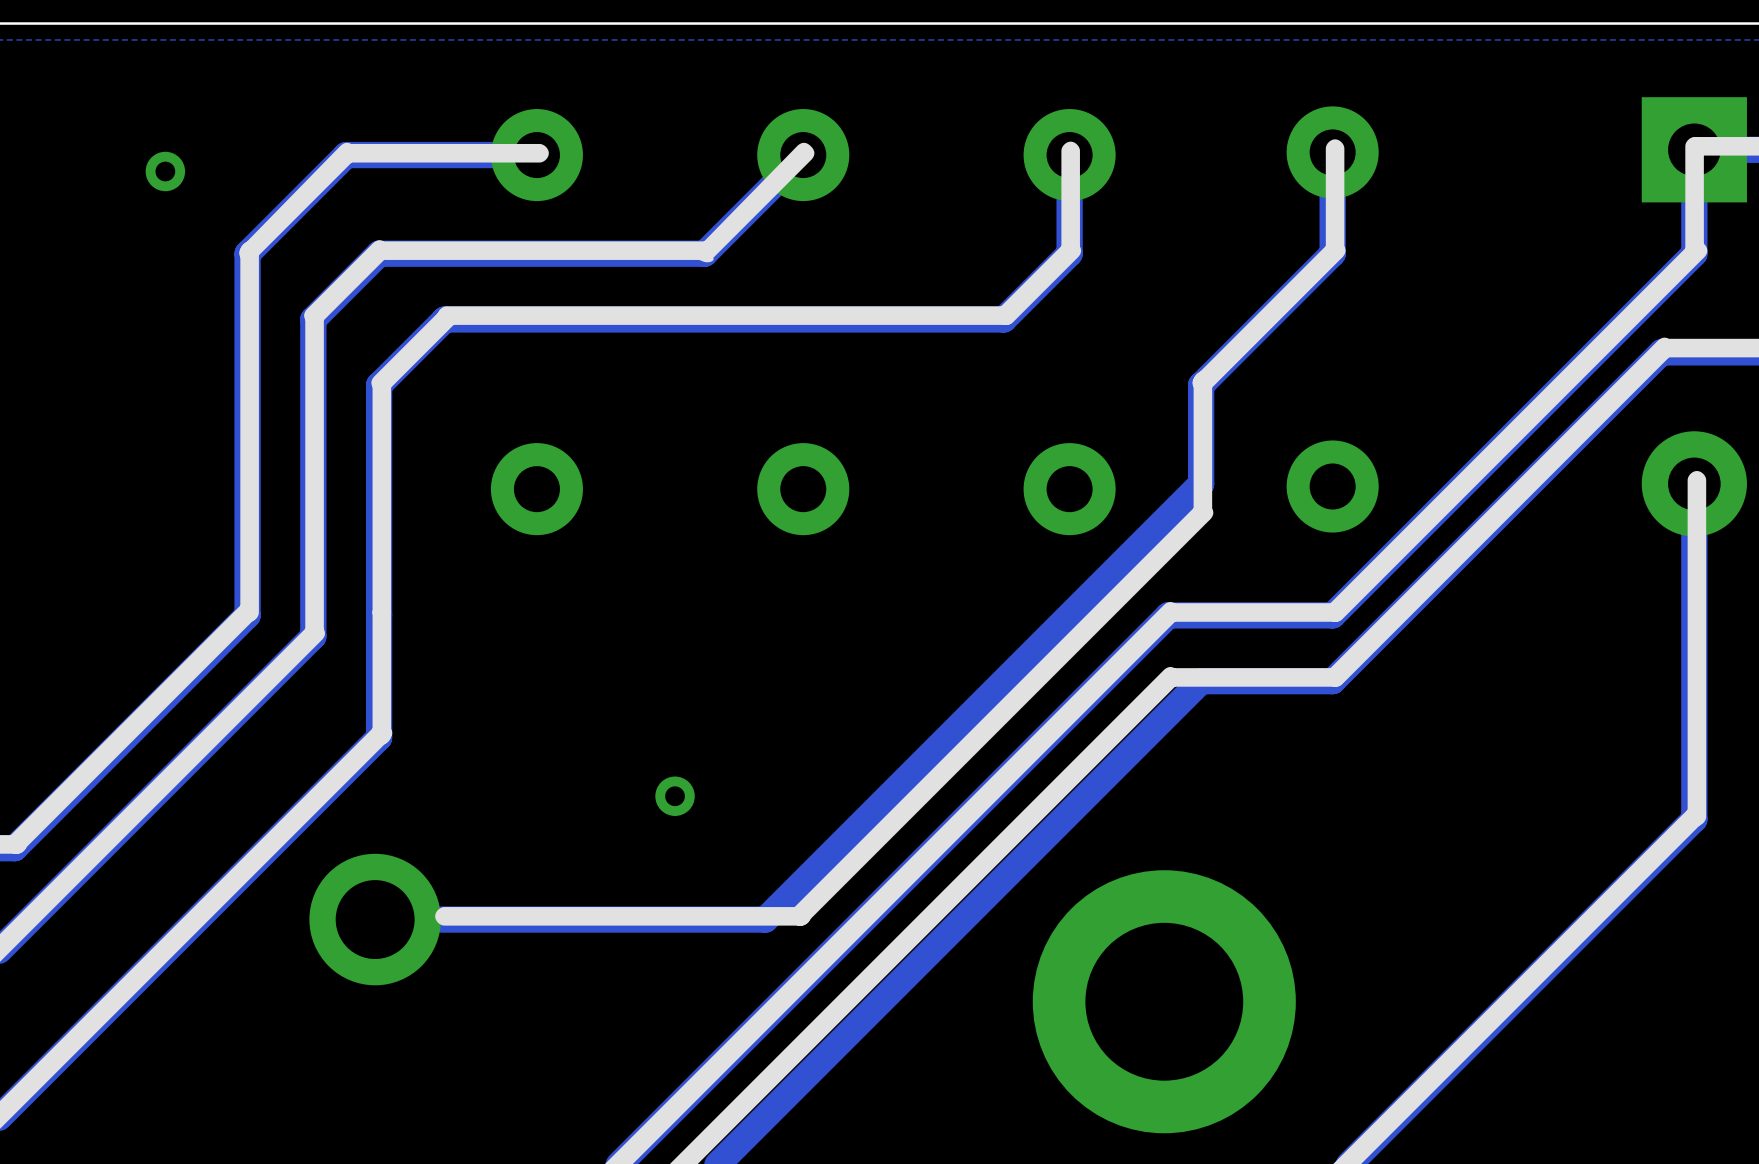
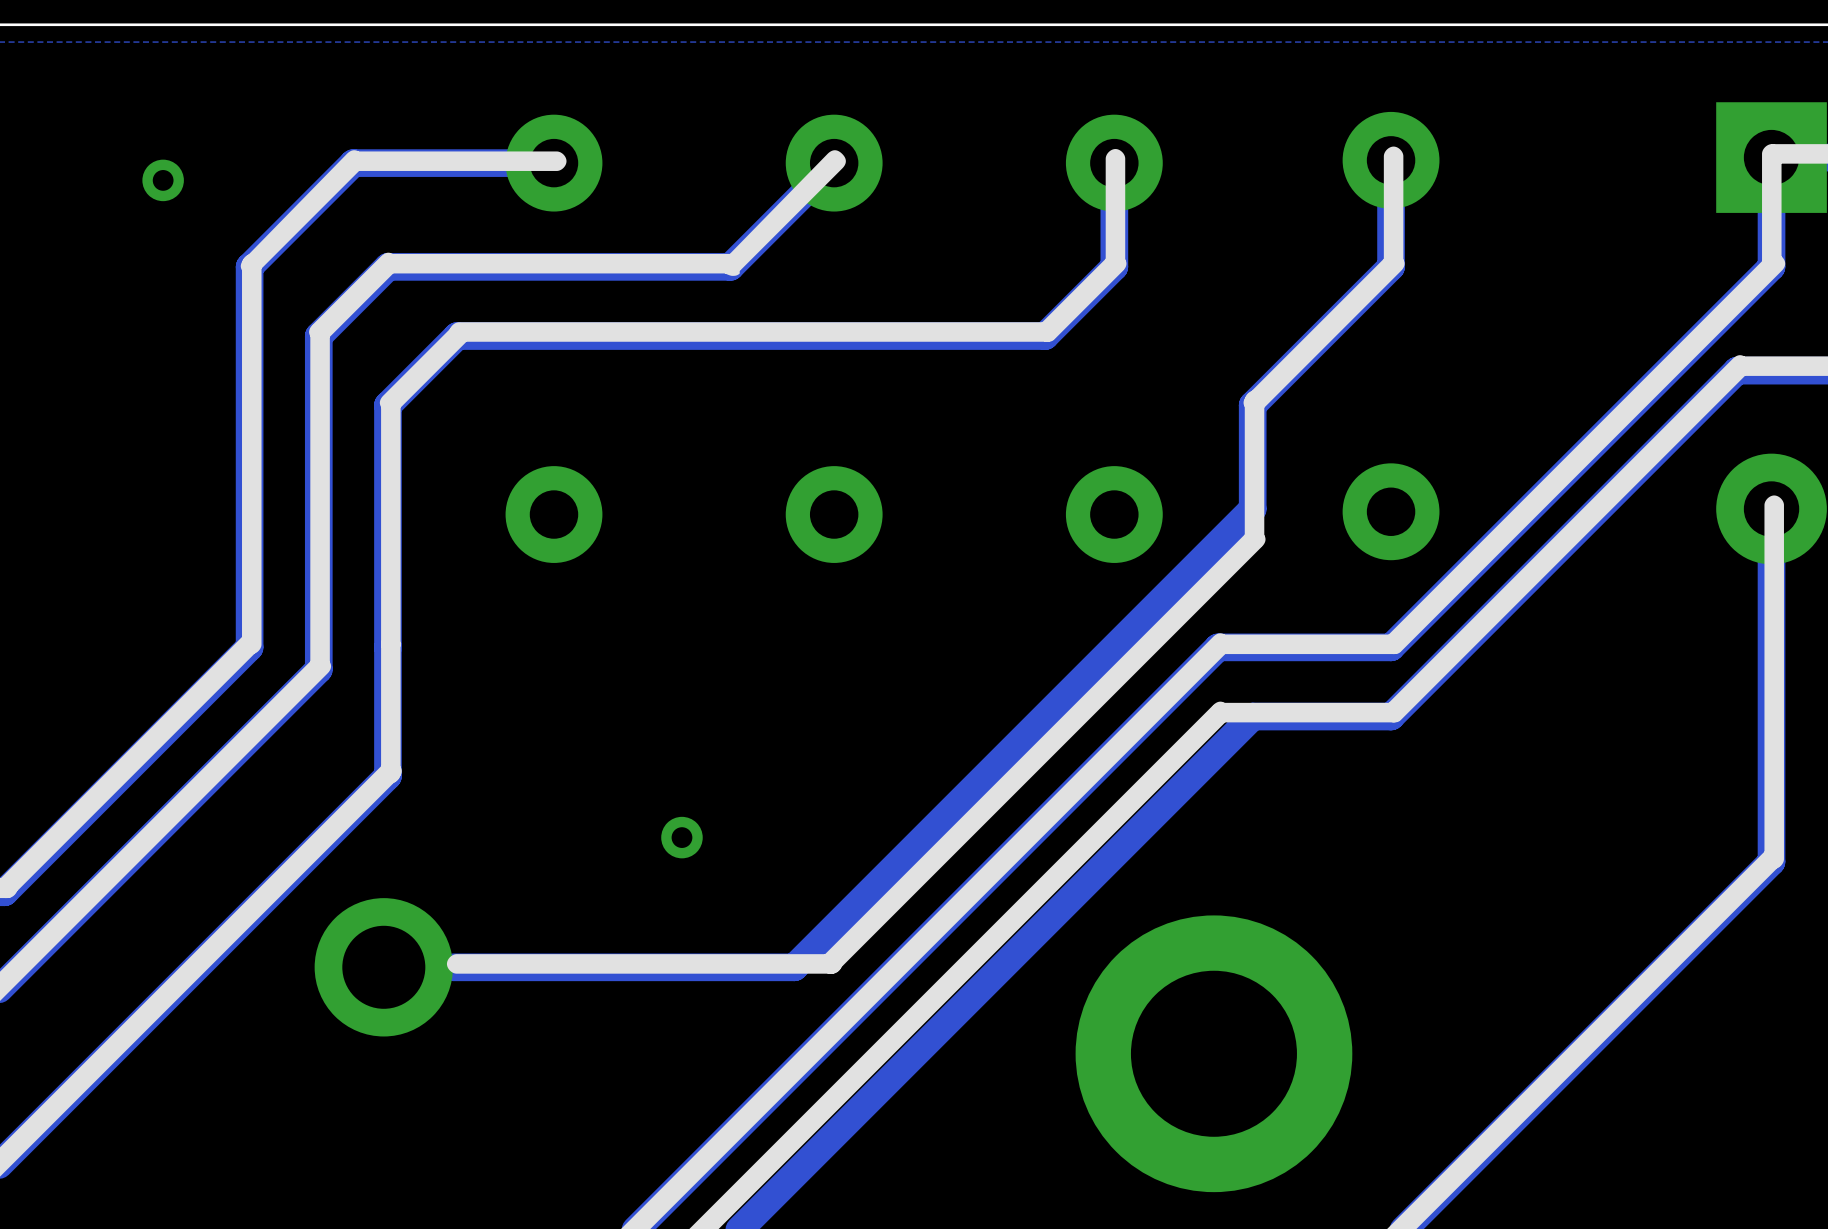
via position: (675, 796) -> (681, 837)

